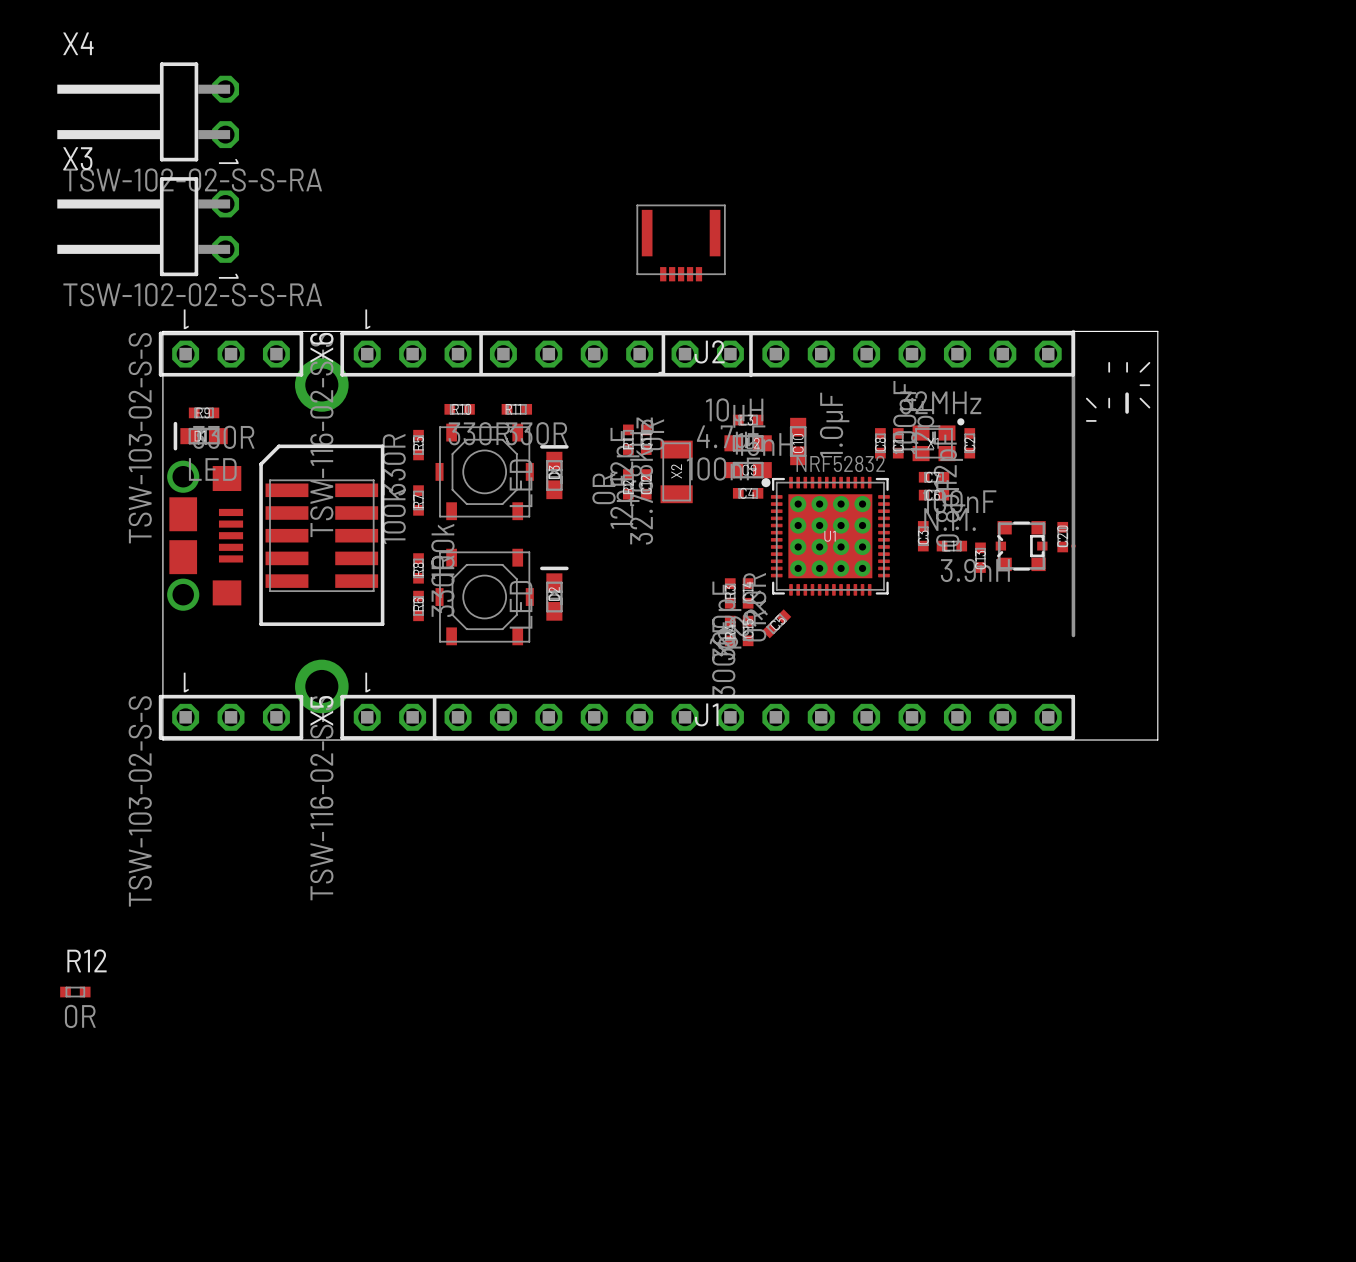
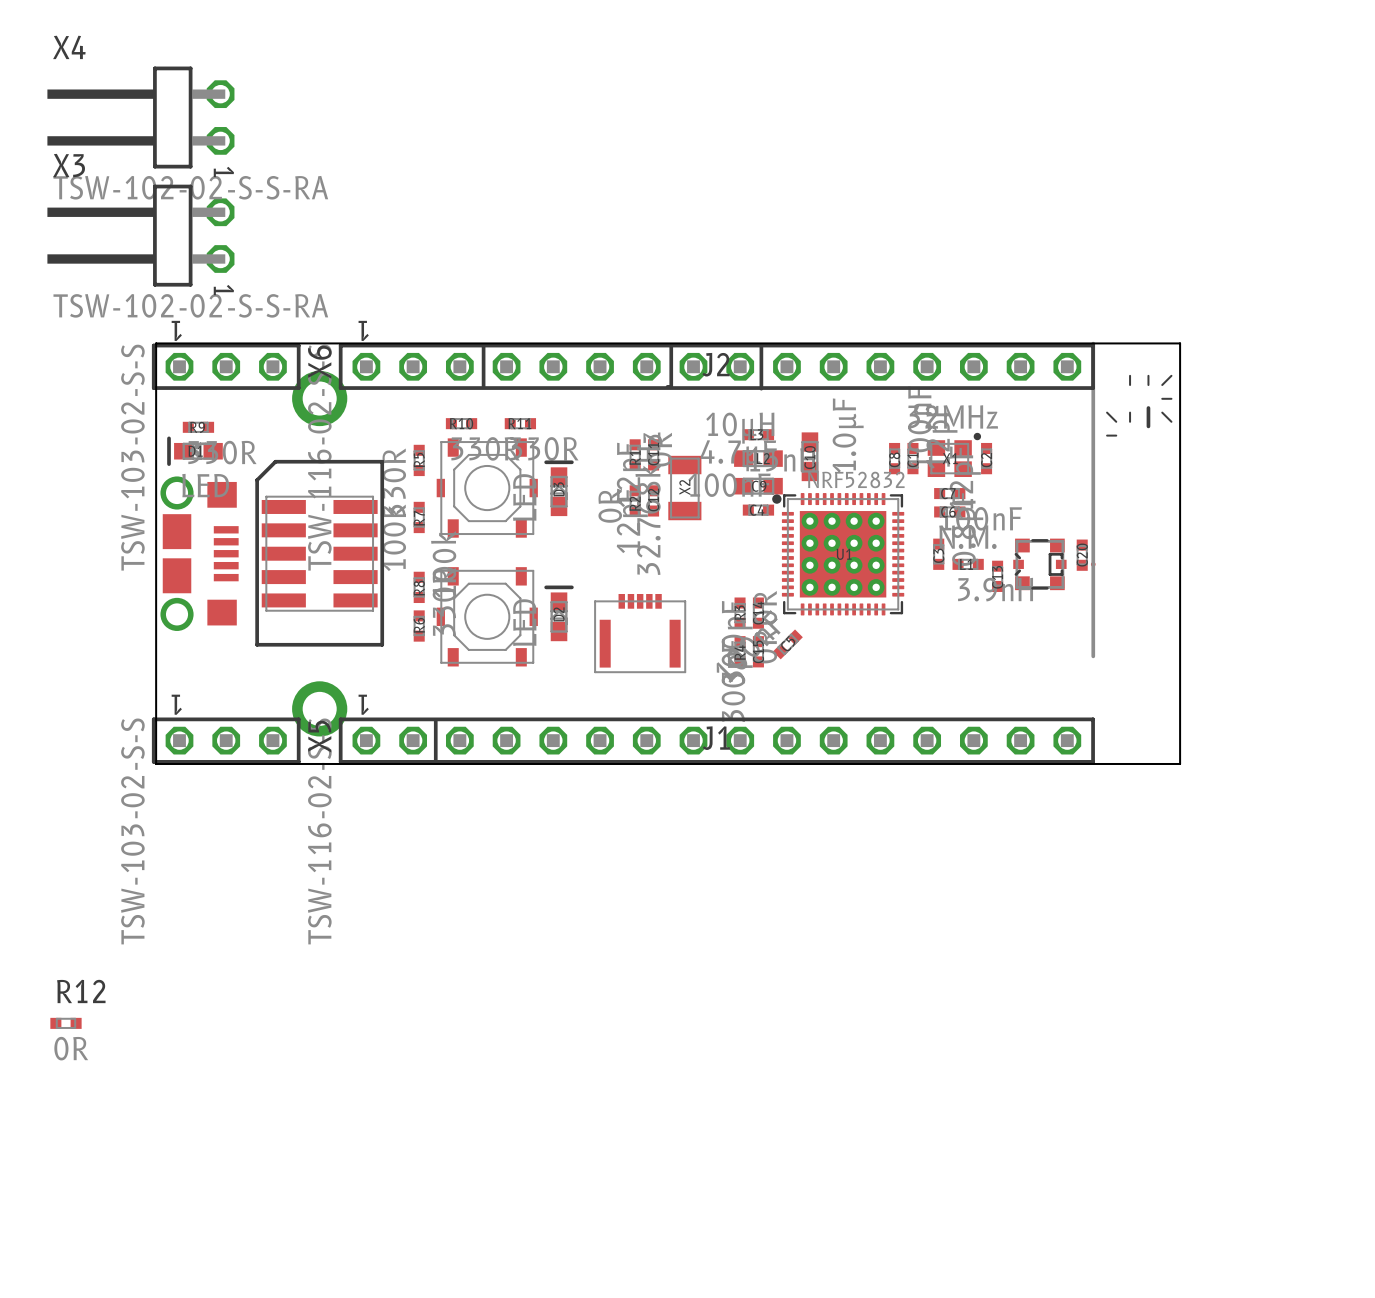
part rotation: 0° (681, 242) -> 180° (640, 633)
part position: (681, 242) -> (640, 633)

